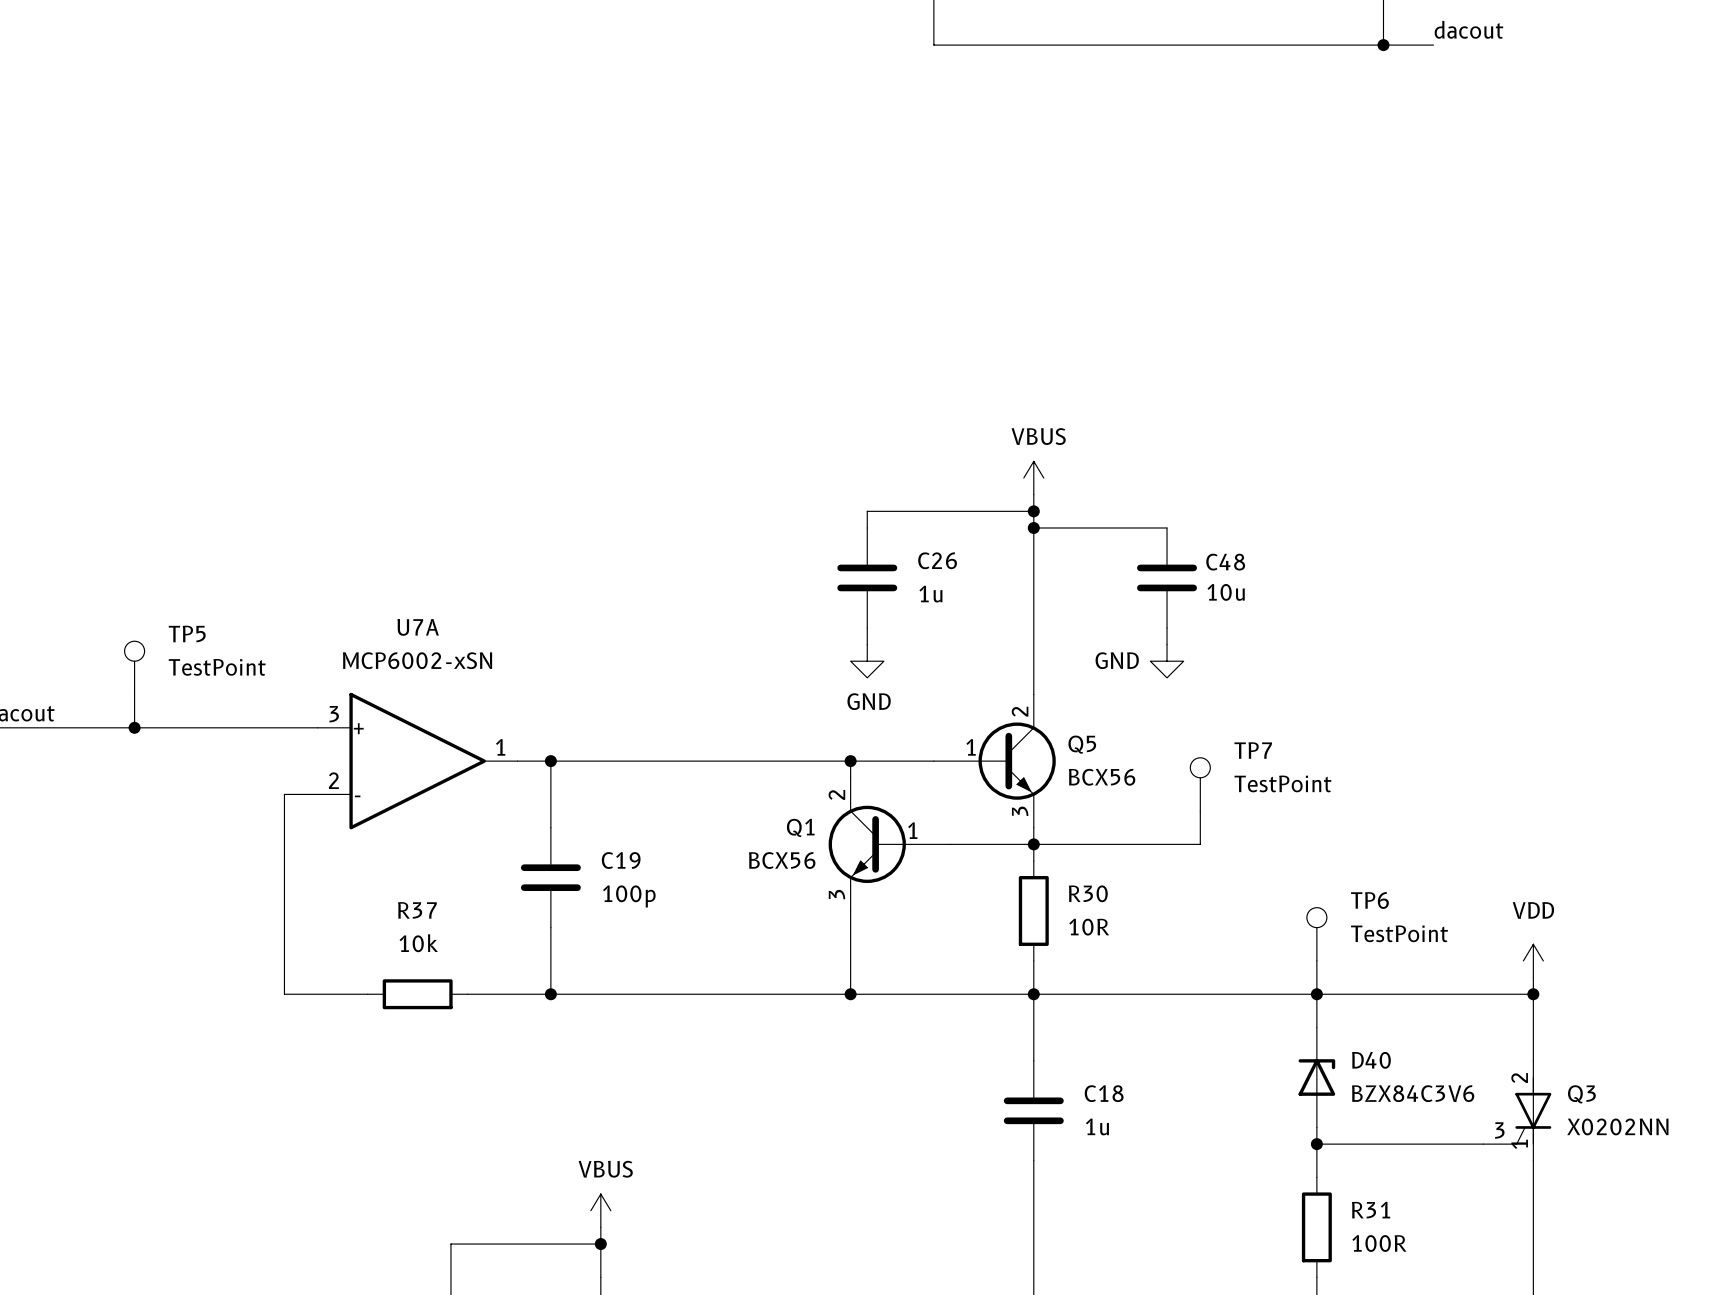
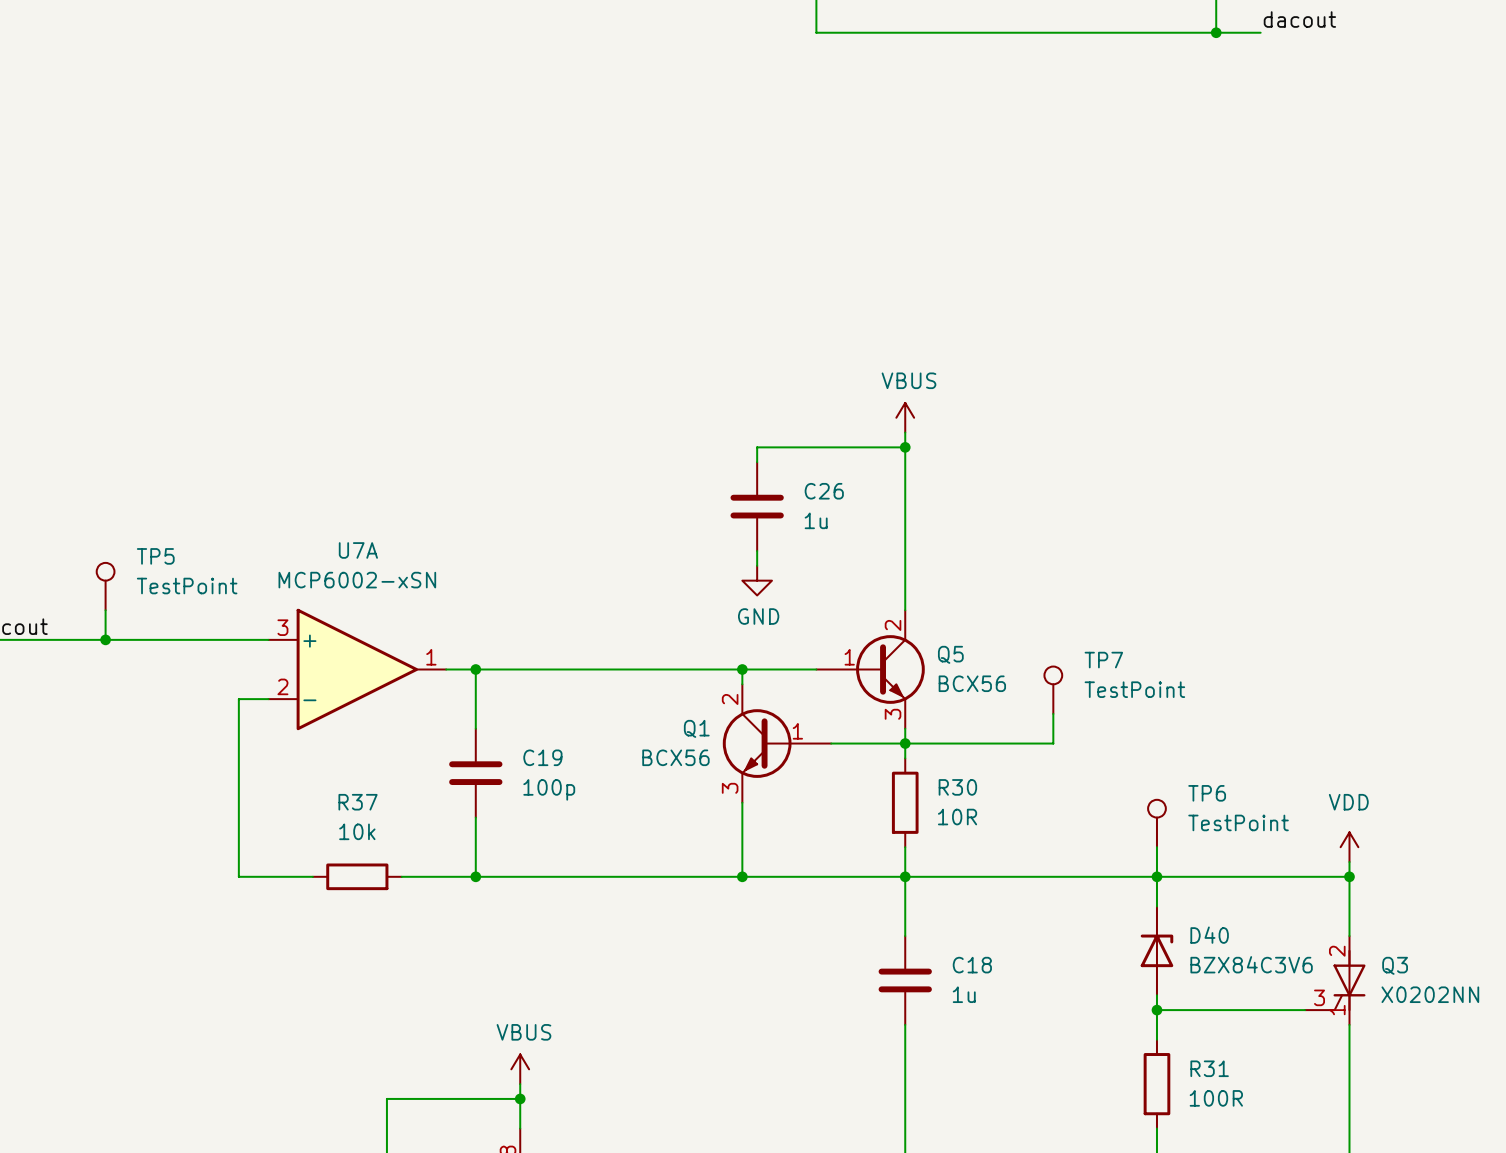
wire: (1033, 527) (1167, 527) -> none
junction: (1033, 527) -> none
C48: 10u (1167, 577) -> none
wire: (1167, 627) (1167, 644) -> none
power symbol: GND (1167, 661) -> none

